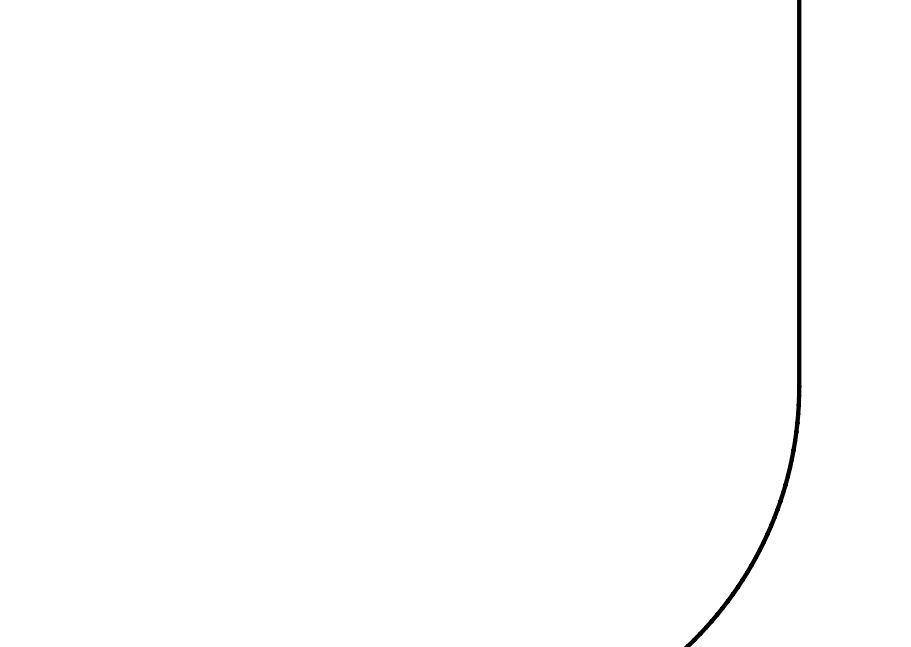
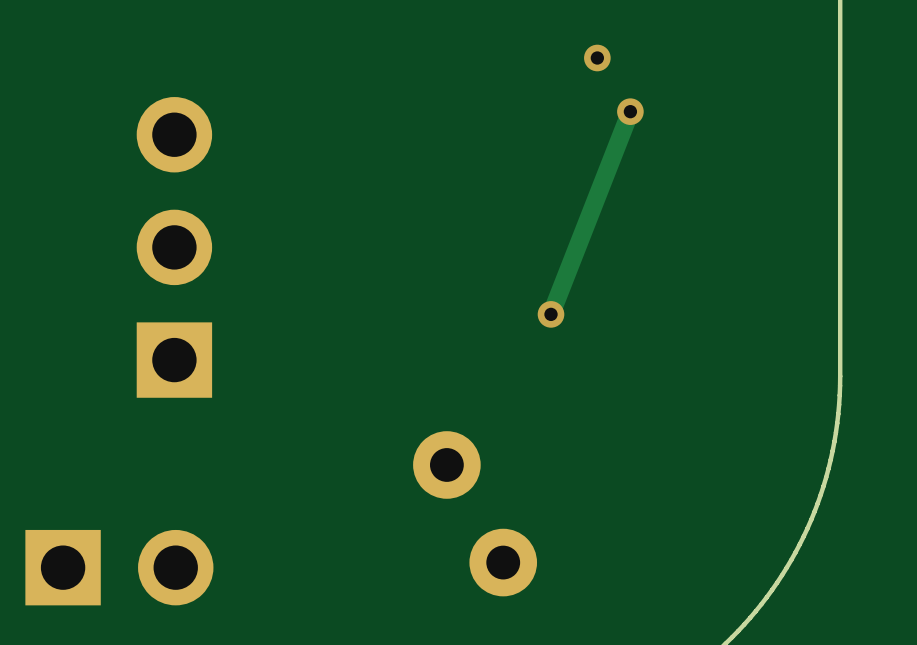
via: none -> (597, 58)
track: none -> (630, 111) (551, 314)
via: none -> (630, 111)
part: none -> (174, 247)
via: none -> (551, 314)
part: none -> (475, 513)
part: none -> (119, 567)

